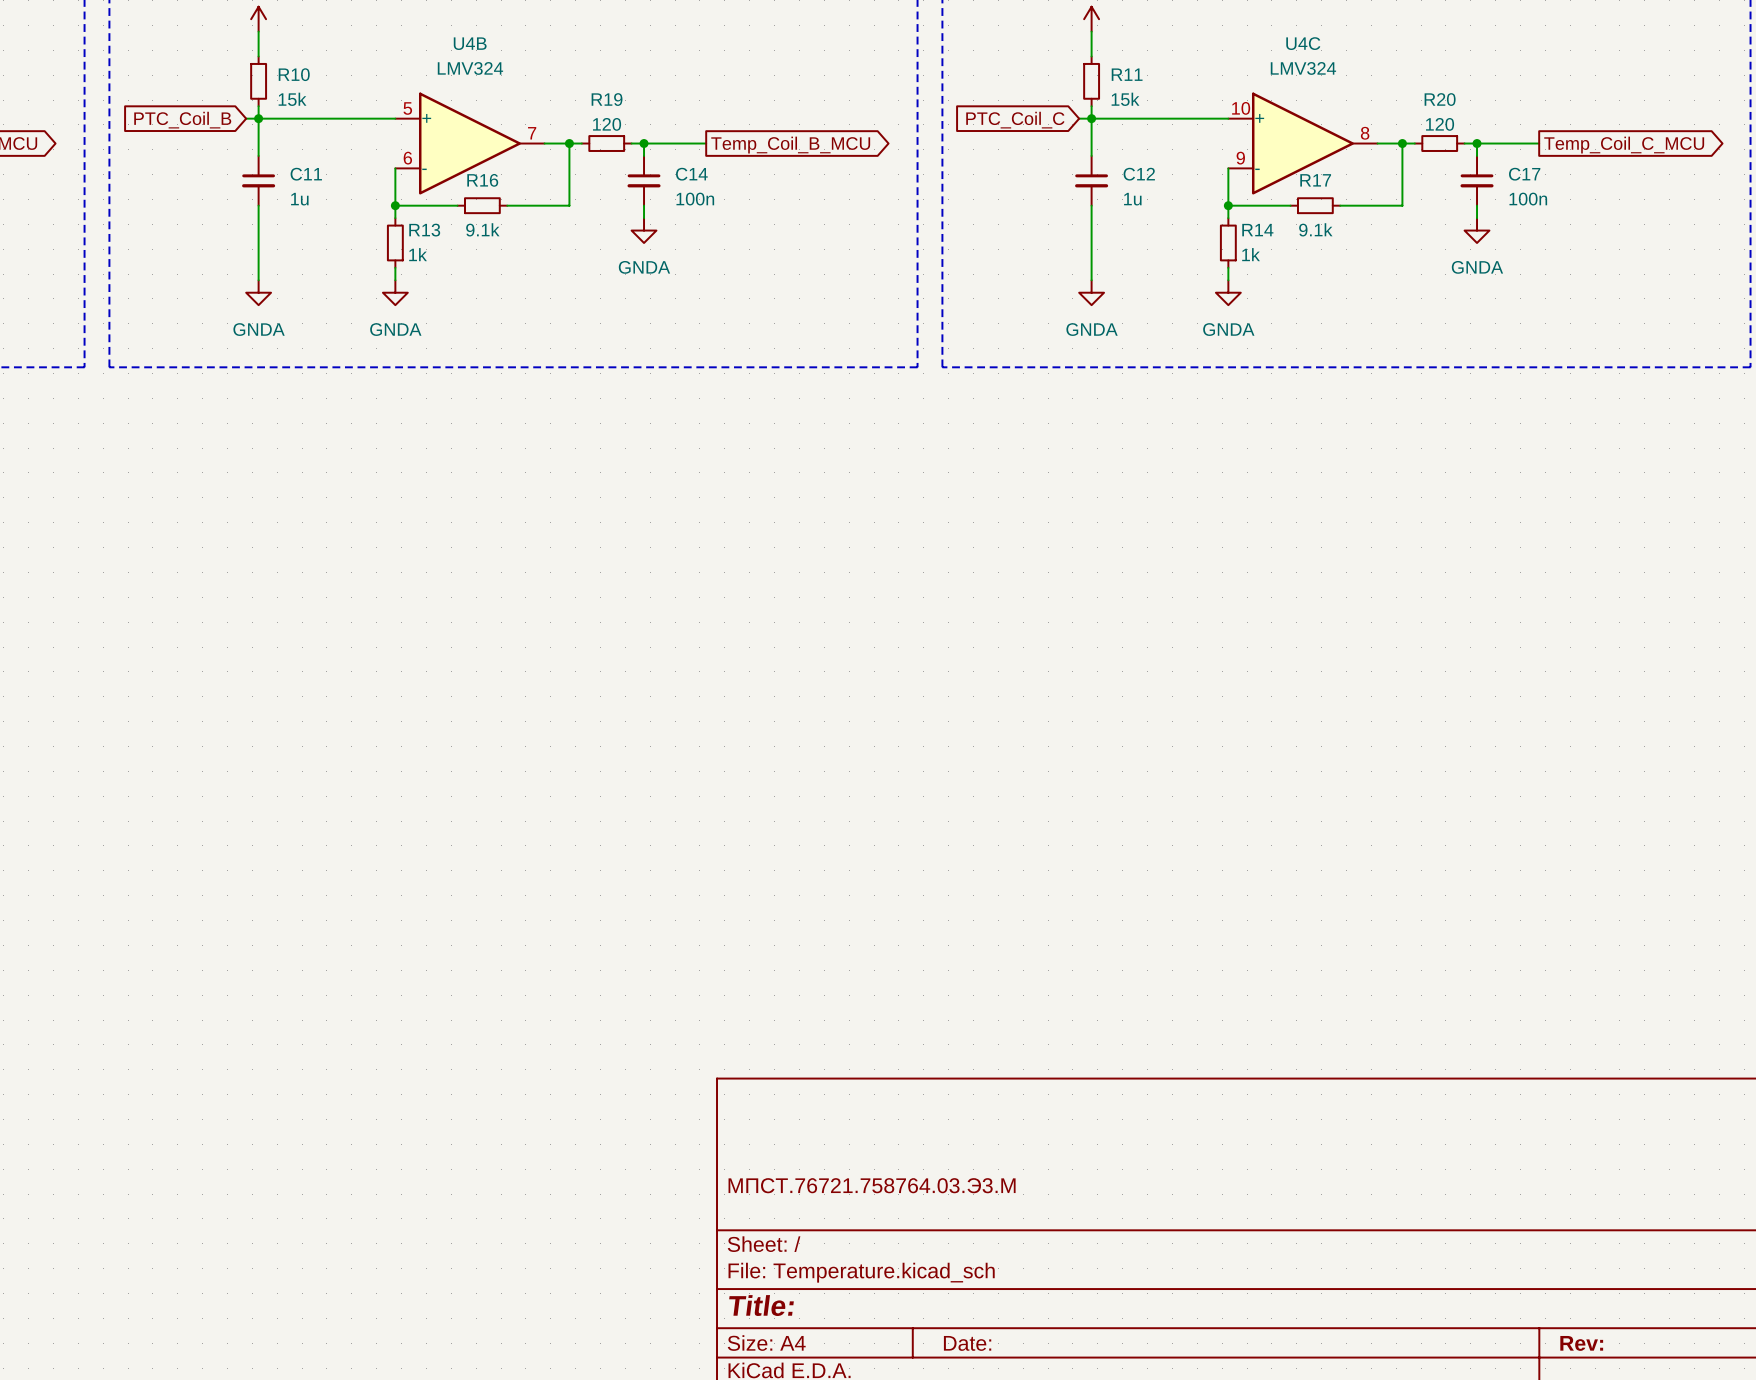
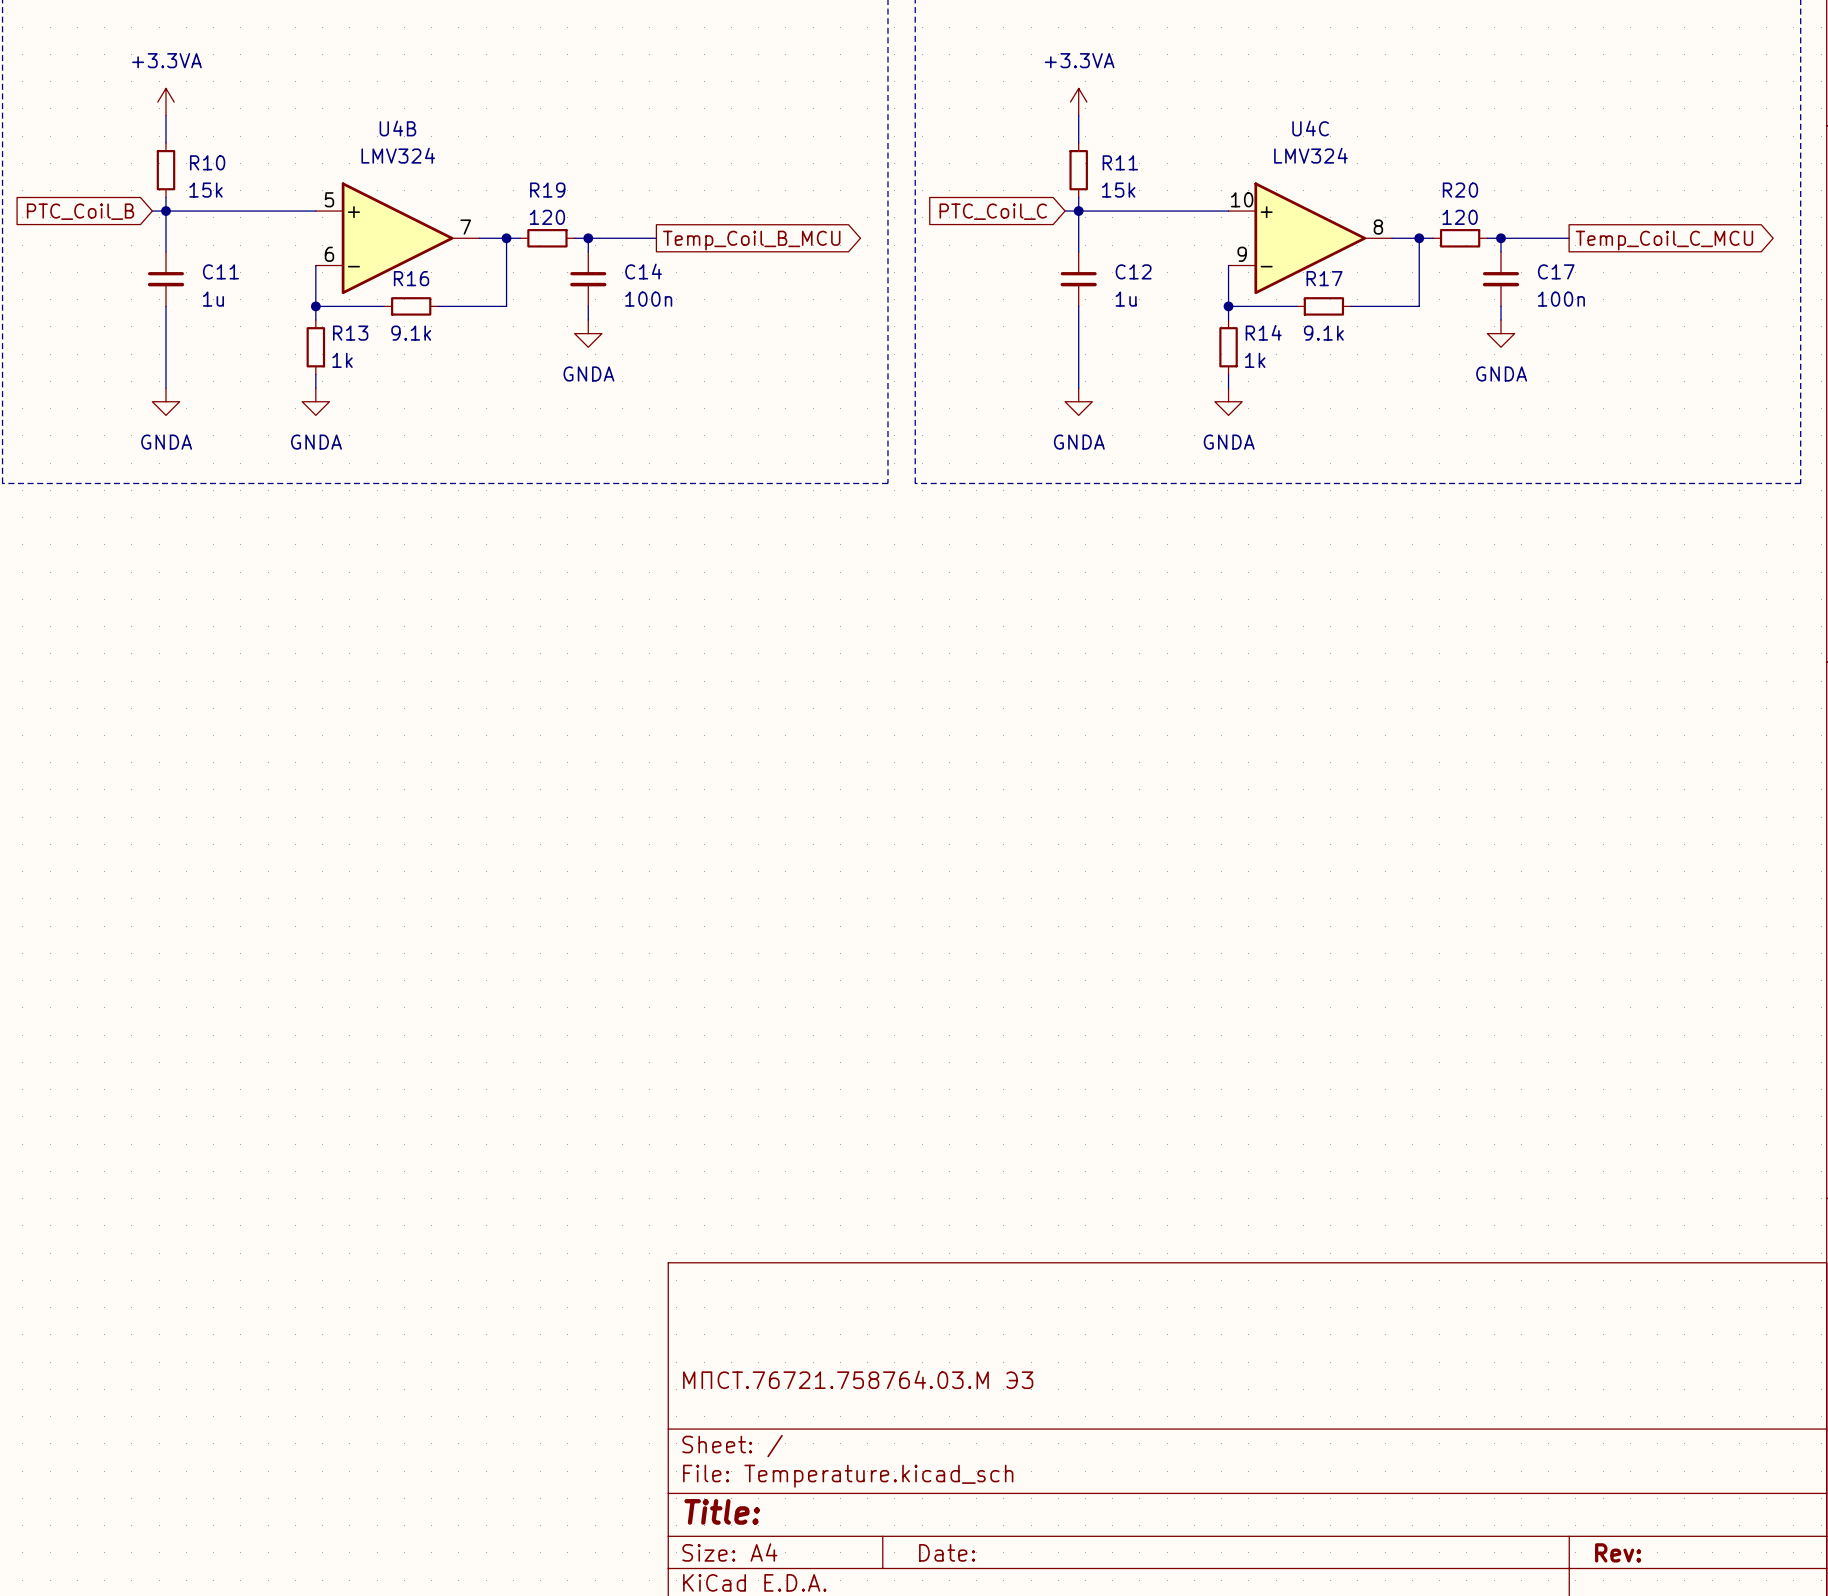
title block: МПСТ.76721.758764.03.Э3.М (872, 1185) -> МПСТ.76721.758764.03.М Э3 (858, 1379)

